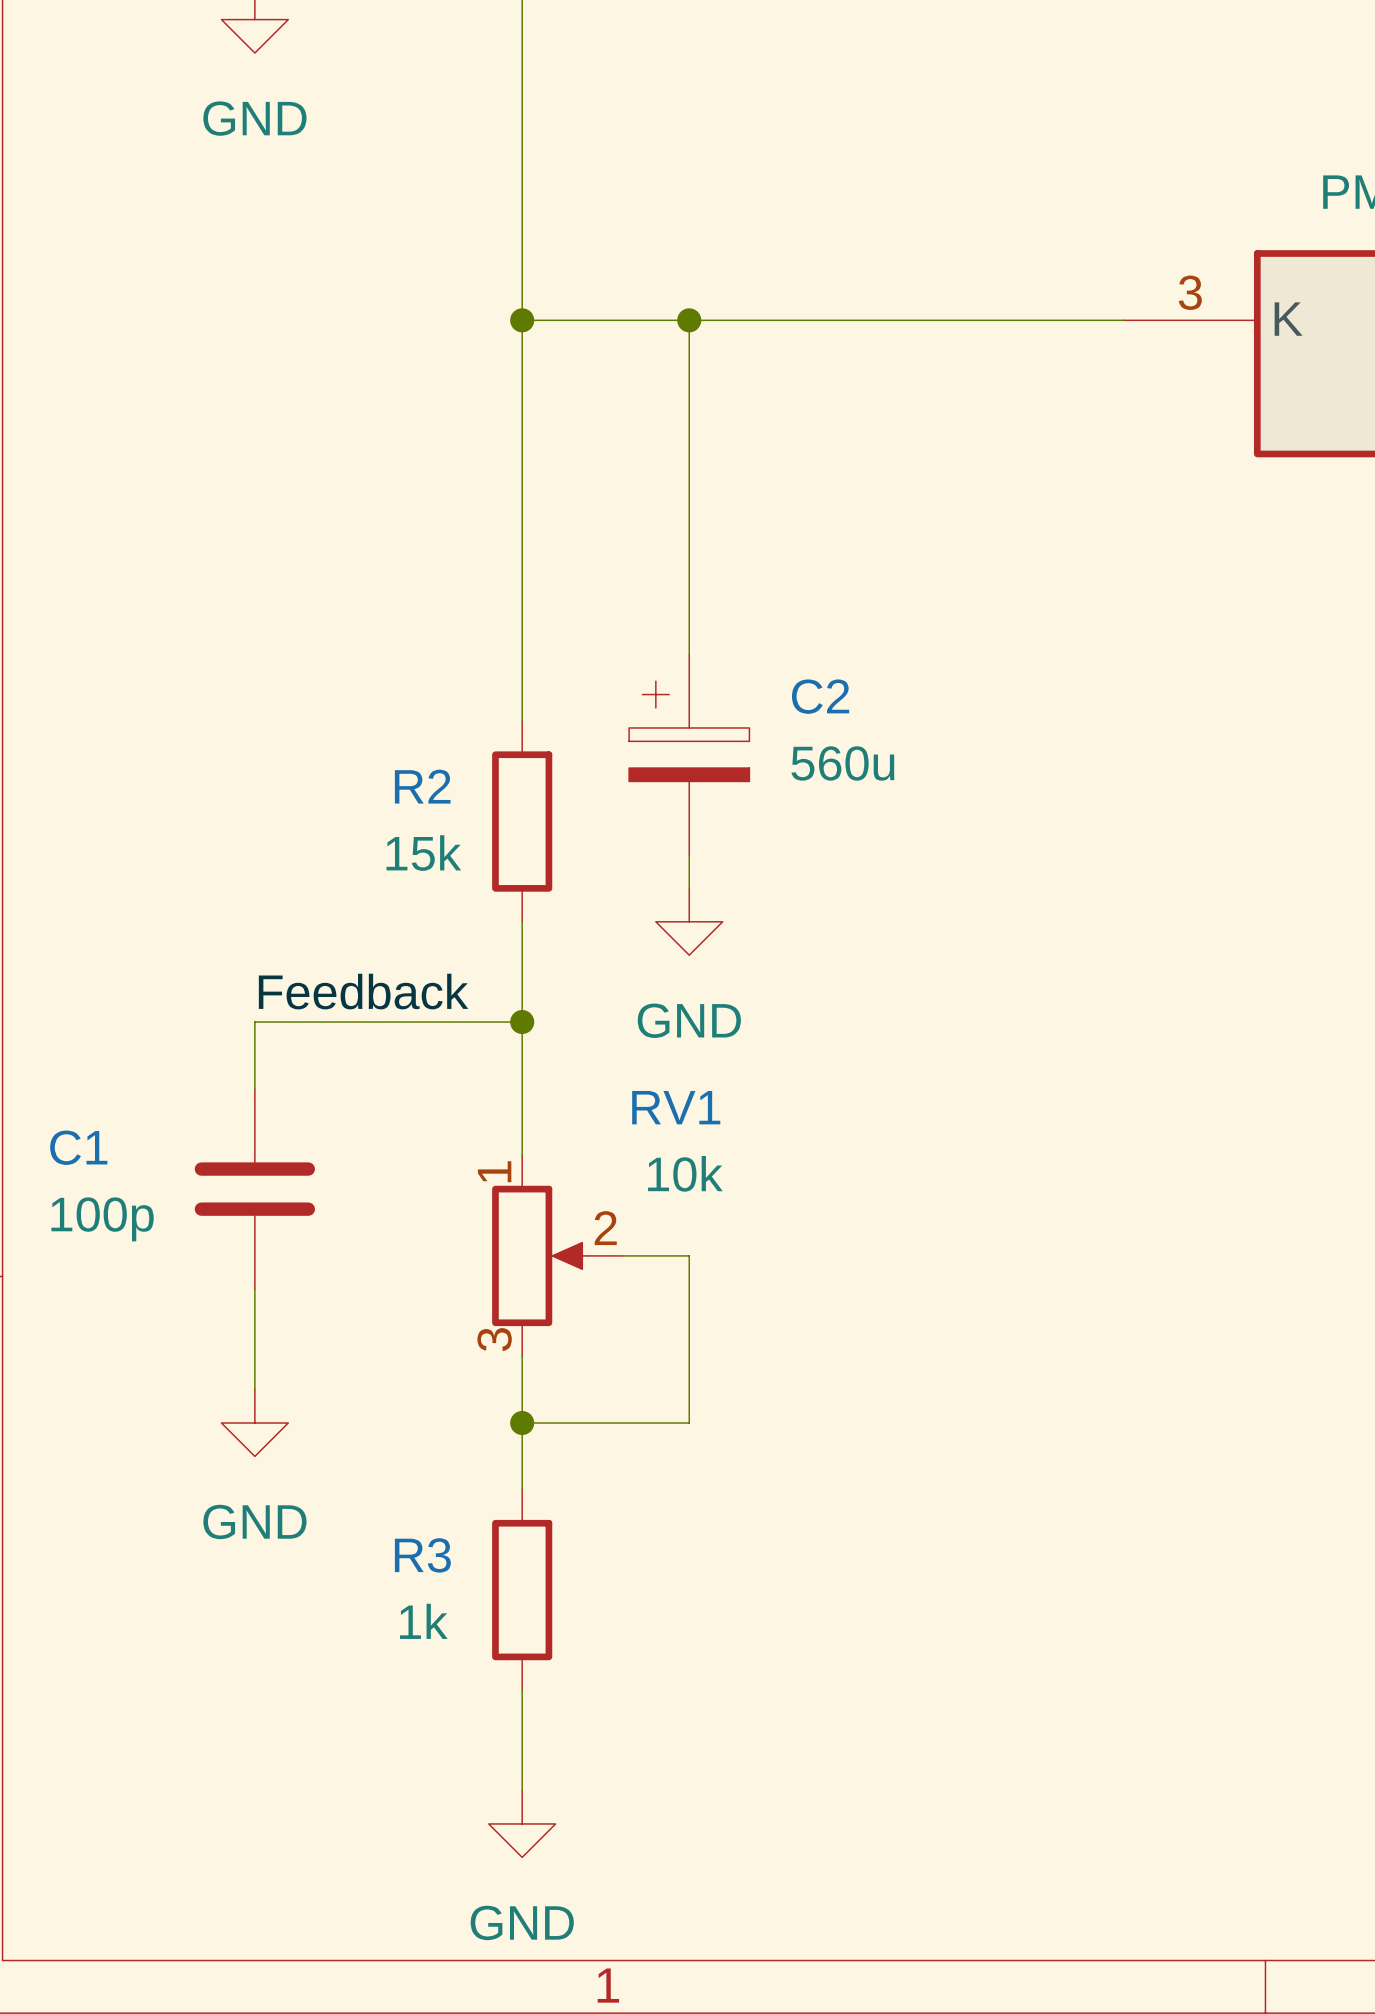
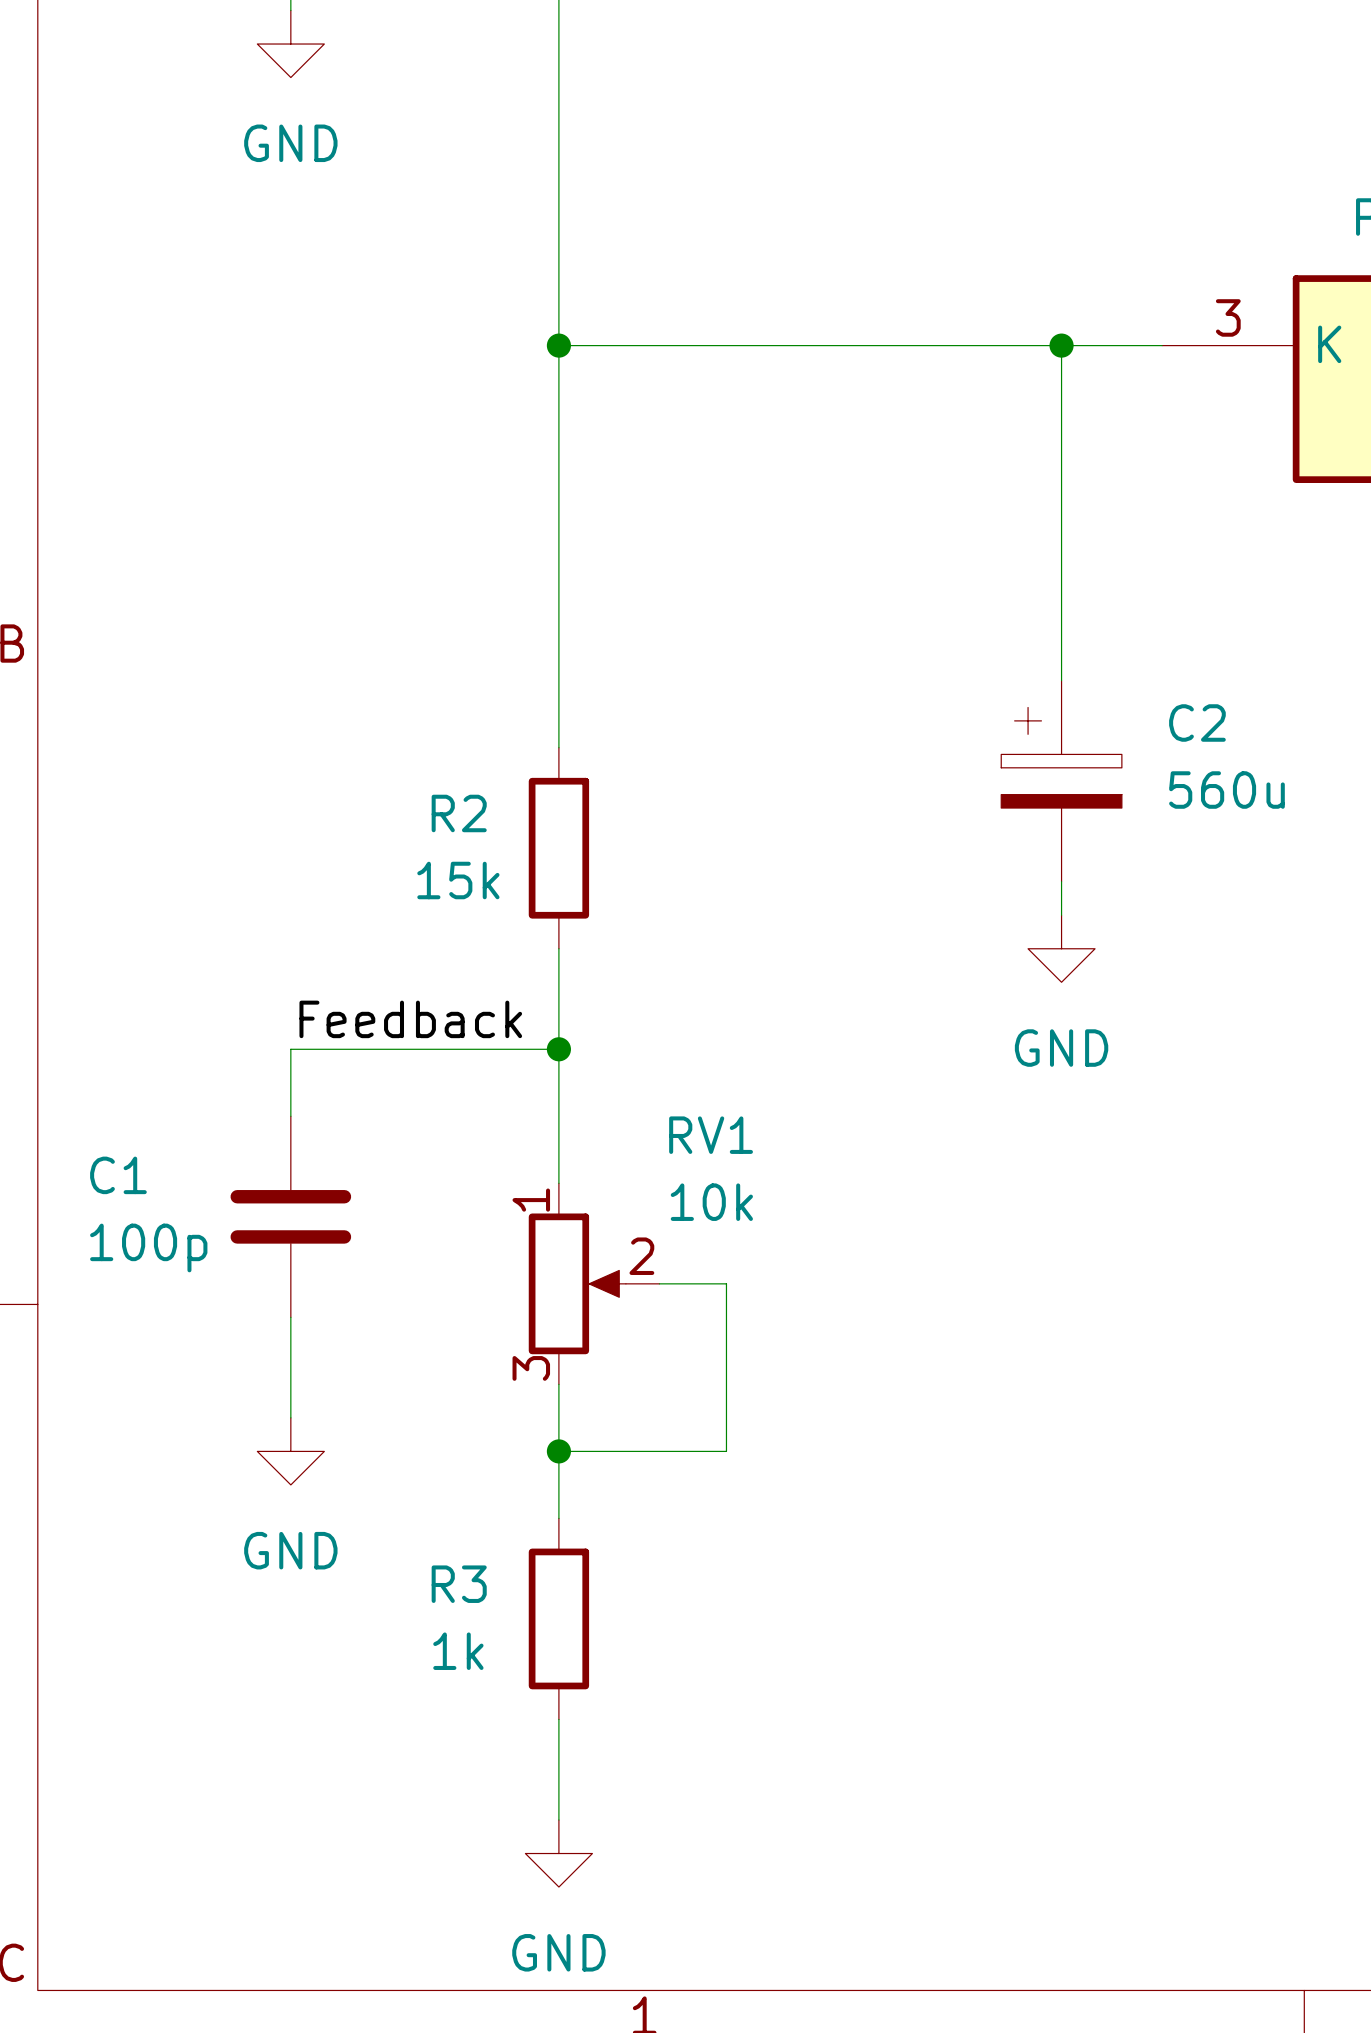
wire: (689, 320) (689, 654) -> (1061, 345) (1061, 680)
junction: (689, 320) -> none
junction: none -> (1061, 345)
C2 position: (689, 754) -> (1061, 781)
wire: (689, 854) (689, 888) -> (1061, 881) (1061, 915)
power symbol position: GND (689, 921) -> GND (1061, 948)

